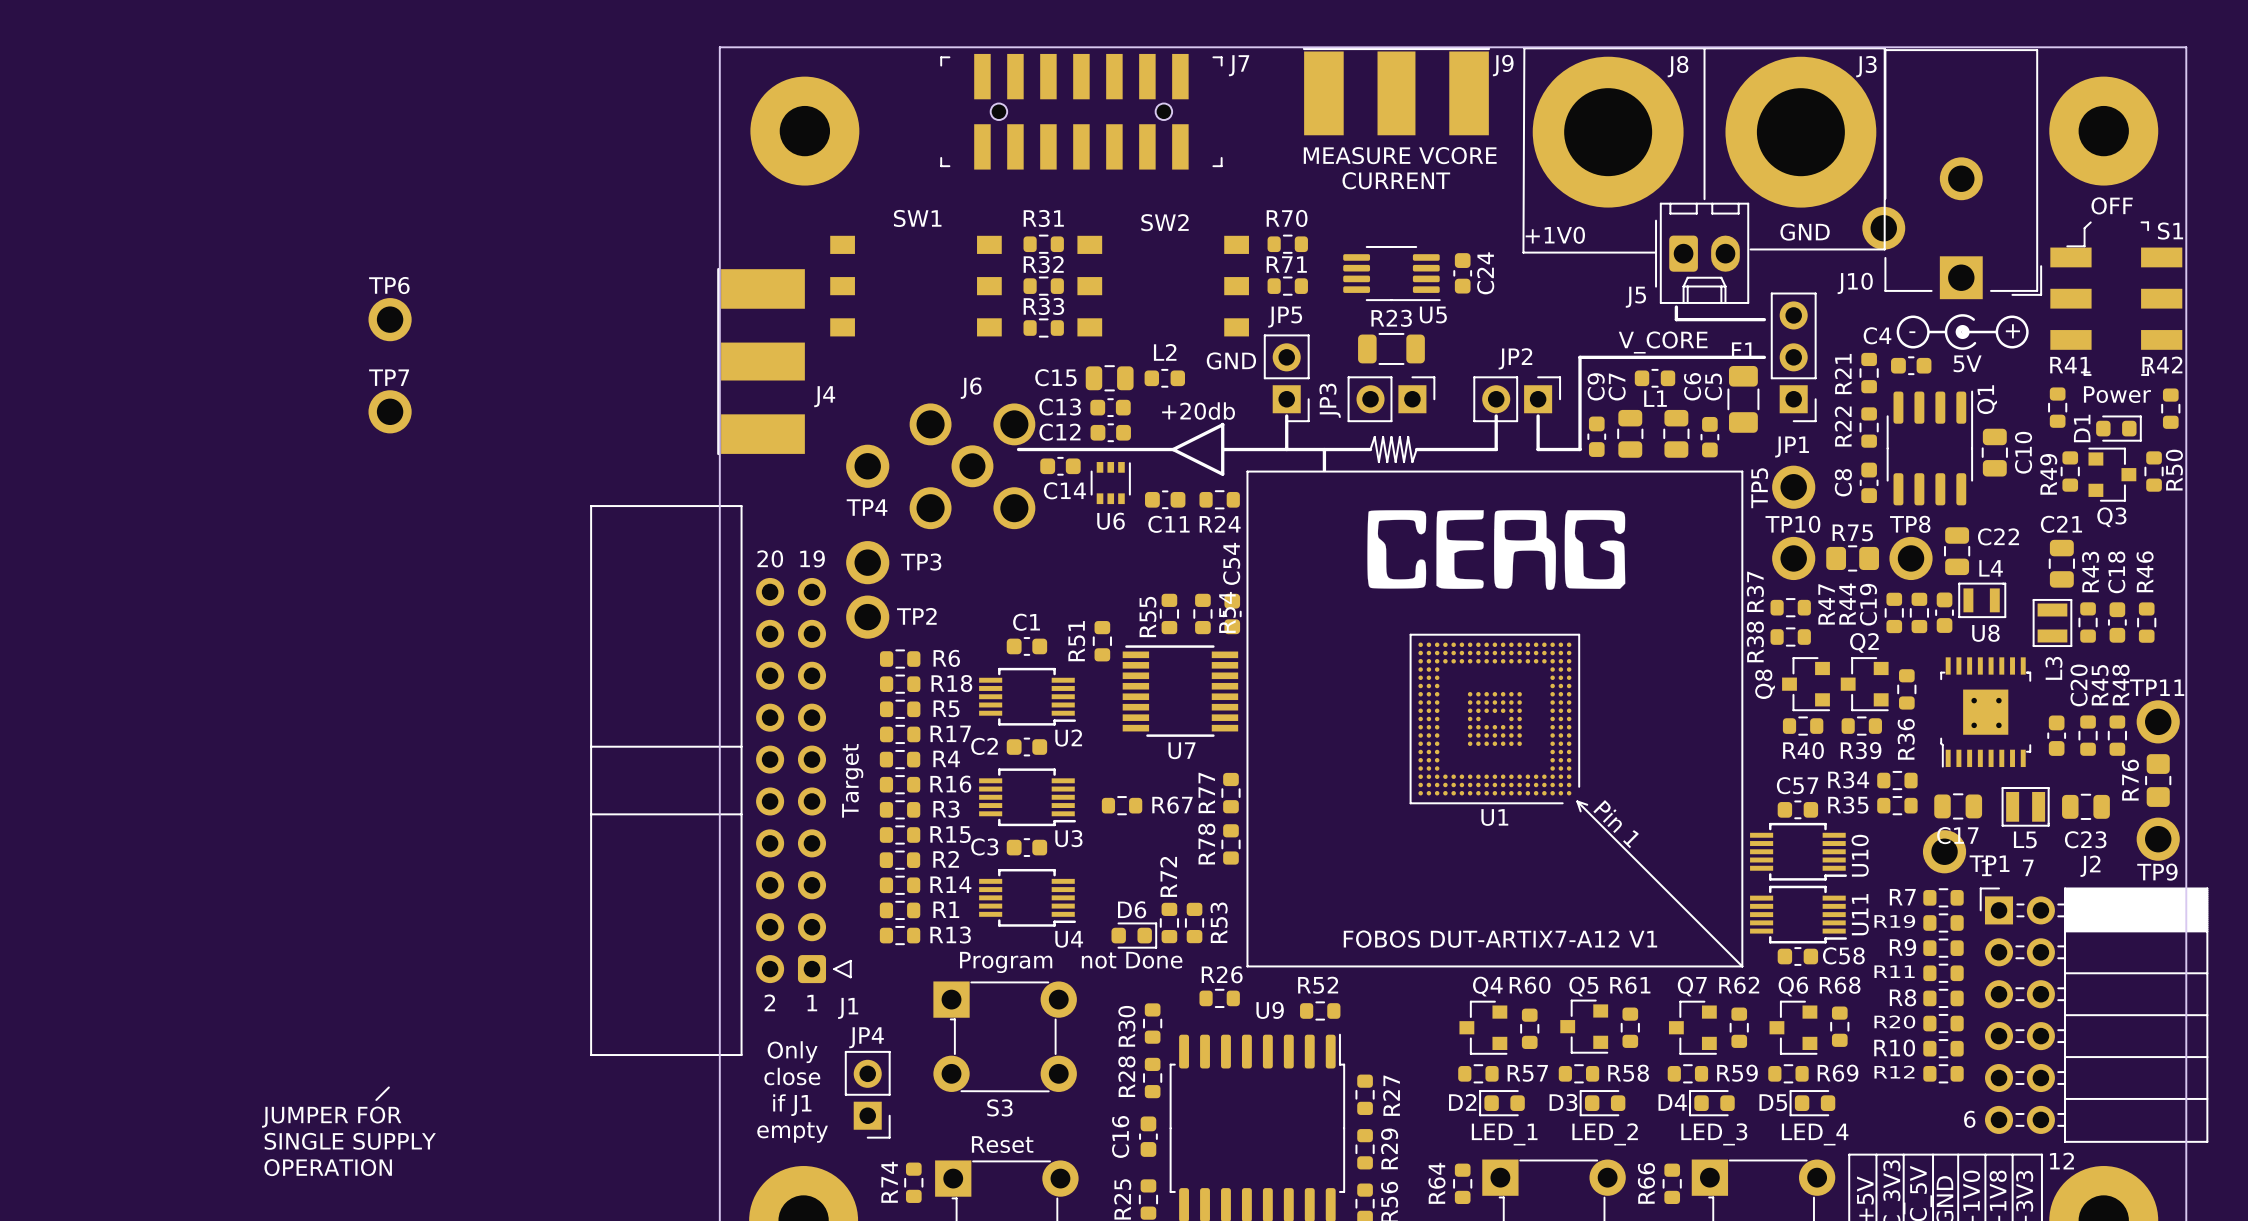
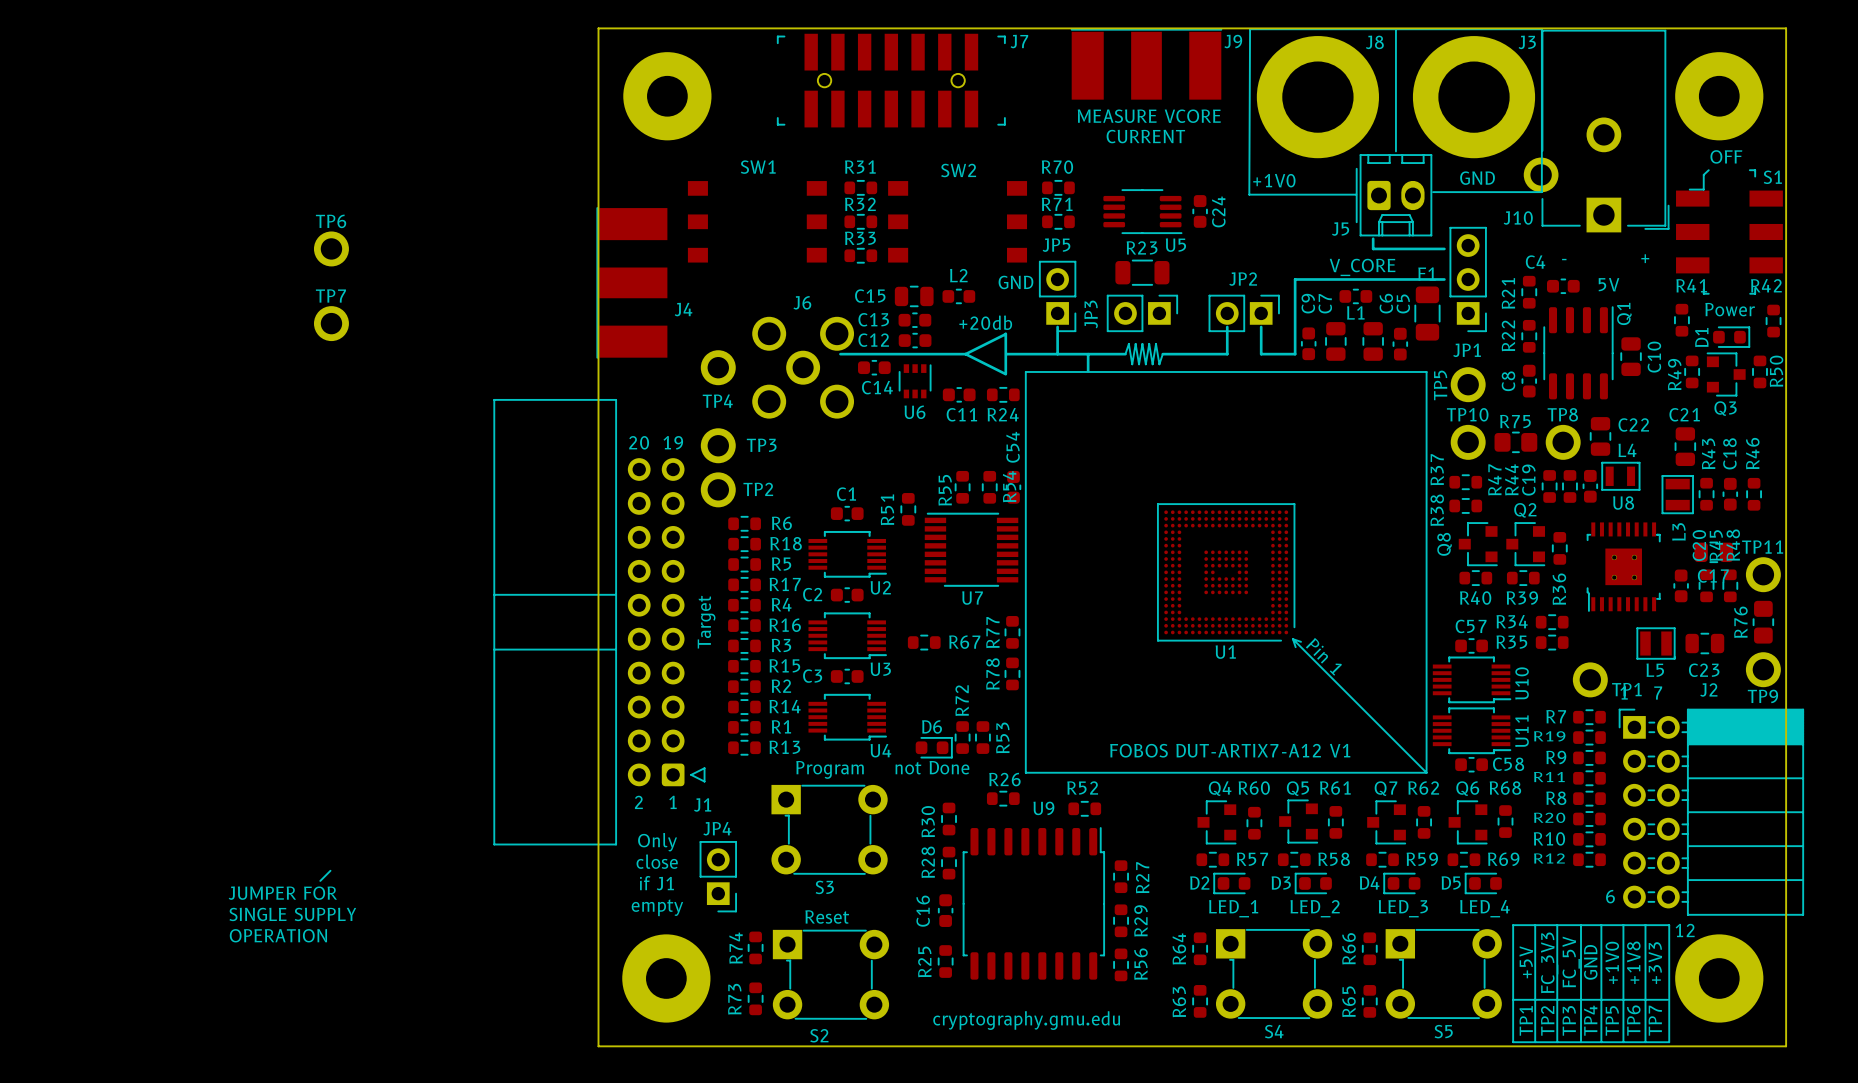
drawing: [1896, 314, 2029, 350] -> none
drawing: [1367, 510, 1626, 590] -> none
C17 position: (1958, 806) -> (1713, 552)

